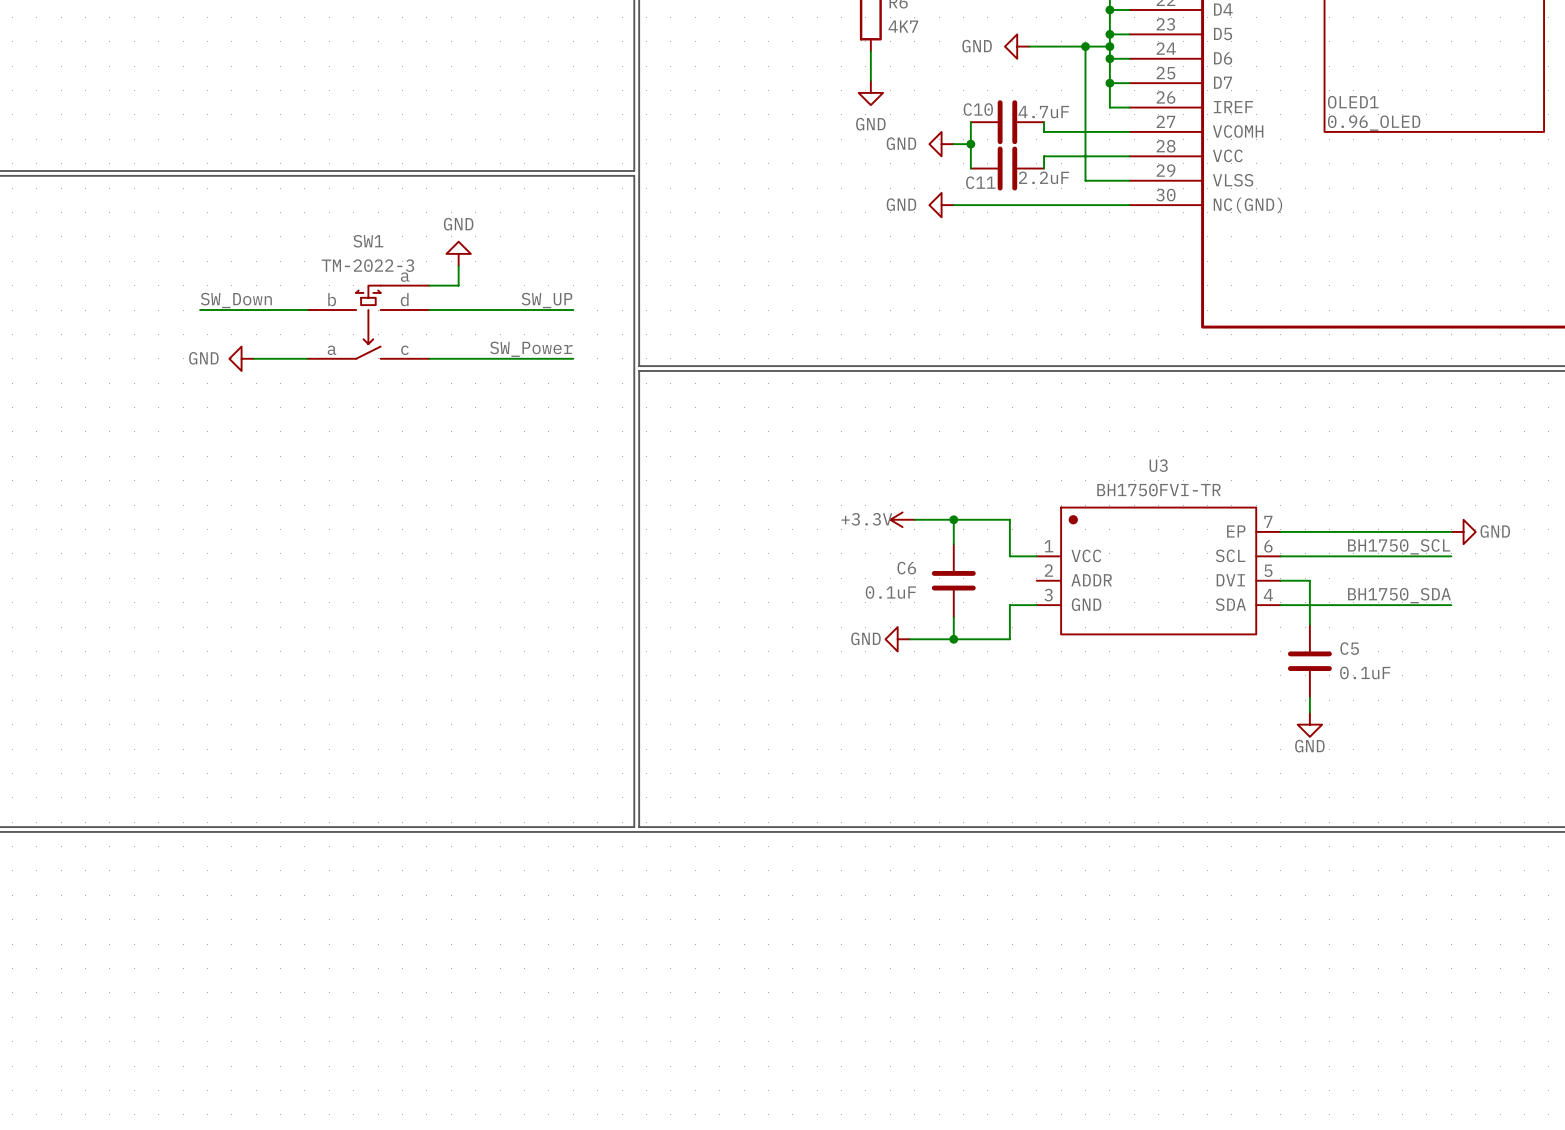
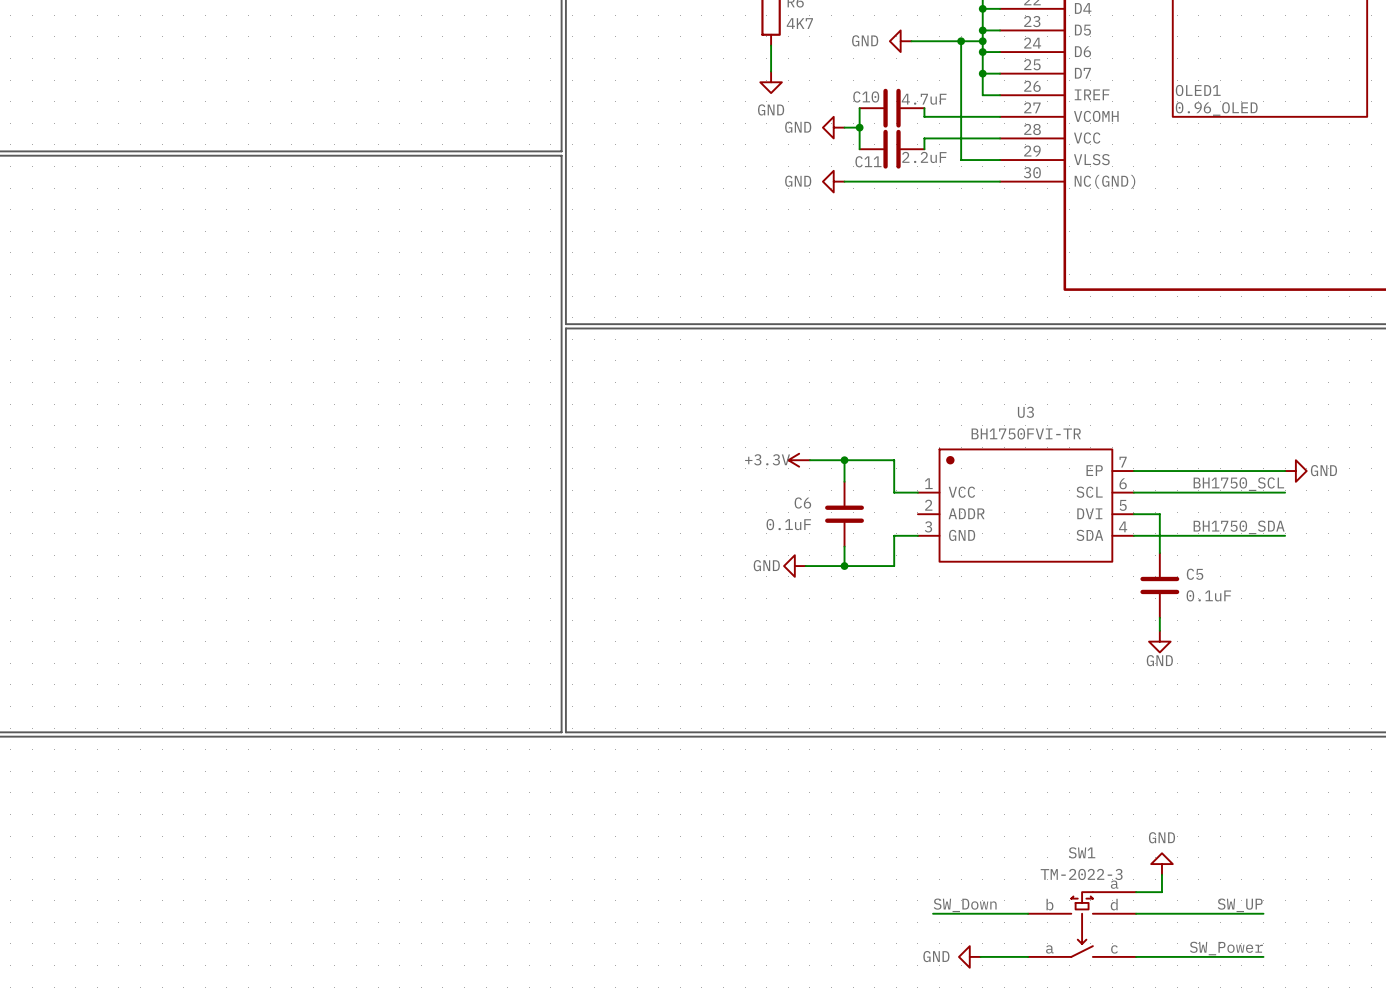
power symbol: GND (458, 253) -> none
wire: (458, 266) (458, 285) (429, 285) -> none
label: SW_Down (236, 300) -> none
label: SW_UP (546, 300) -> none
wire: (200, 310) (307, 310) -> none
wire: (429, 310) (573, 310) -> none
SW1 position: (368, 322) -> (1082, 924)
label: SW_Power (531, 349) -> none
power symbol: GND (241, 358) -> none
wire: (253, 358) (307, 358) -> none
wire: (429, 358) (573, 358) -> none
power symbol: none -> GND (1161, 864)
wire: none -> (1161, 874) (1161, 892) (1136, 892)
label: none -> SW_Down (965, 905)
label: none -> SW_UP (1240, 905)
wire: none -> (933, 913) (1028, 913)
wire: none -> (1136, 913) (1263, 913)
label: none -> SW_Power (1226, 948)
power symbol: none -> GND (969, 956)
wire: none -> (980, 956) (1028, 956)
wire: none -> (1136, 956) (1263, 956)

